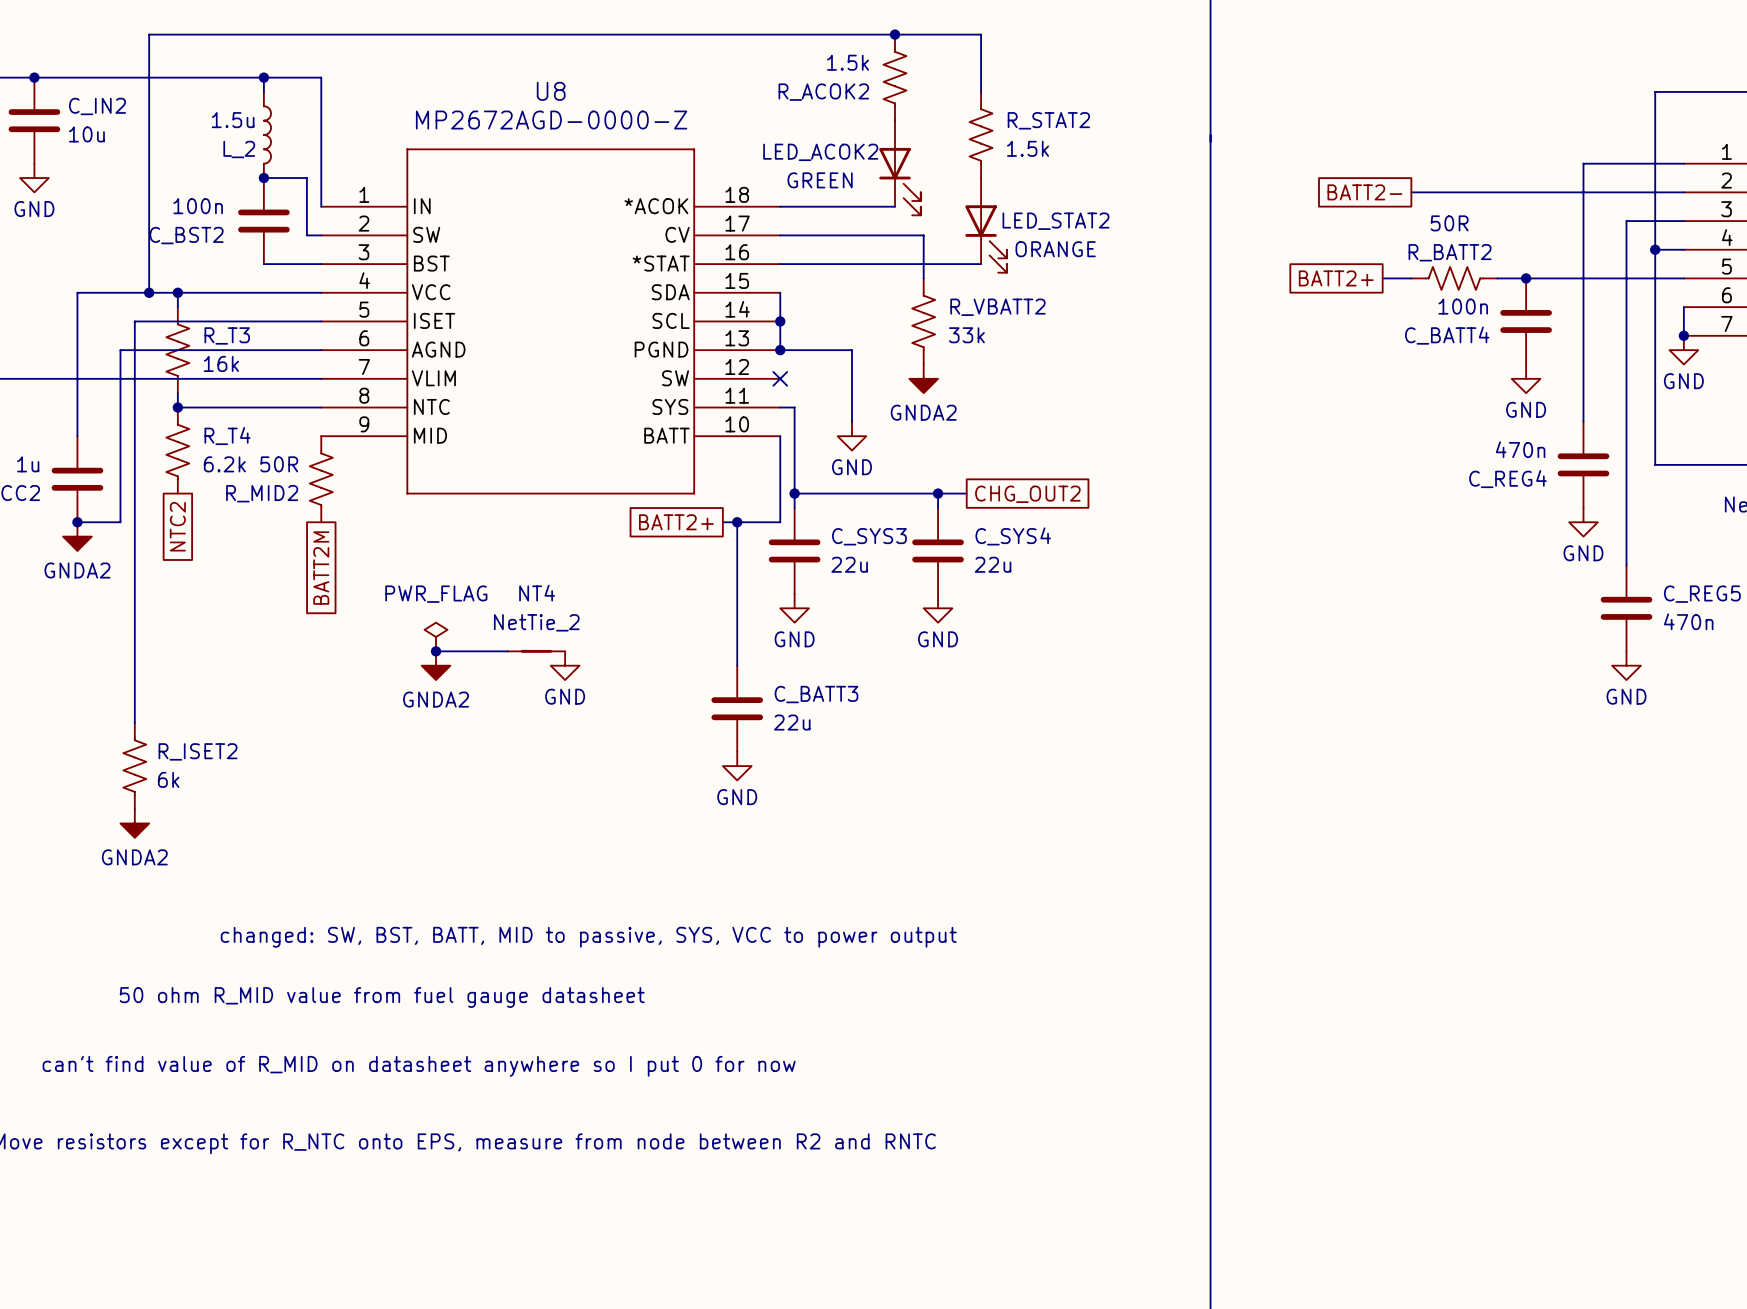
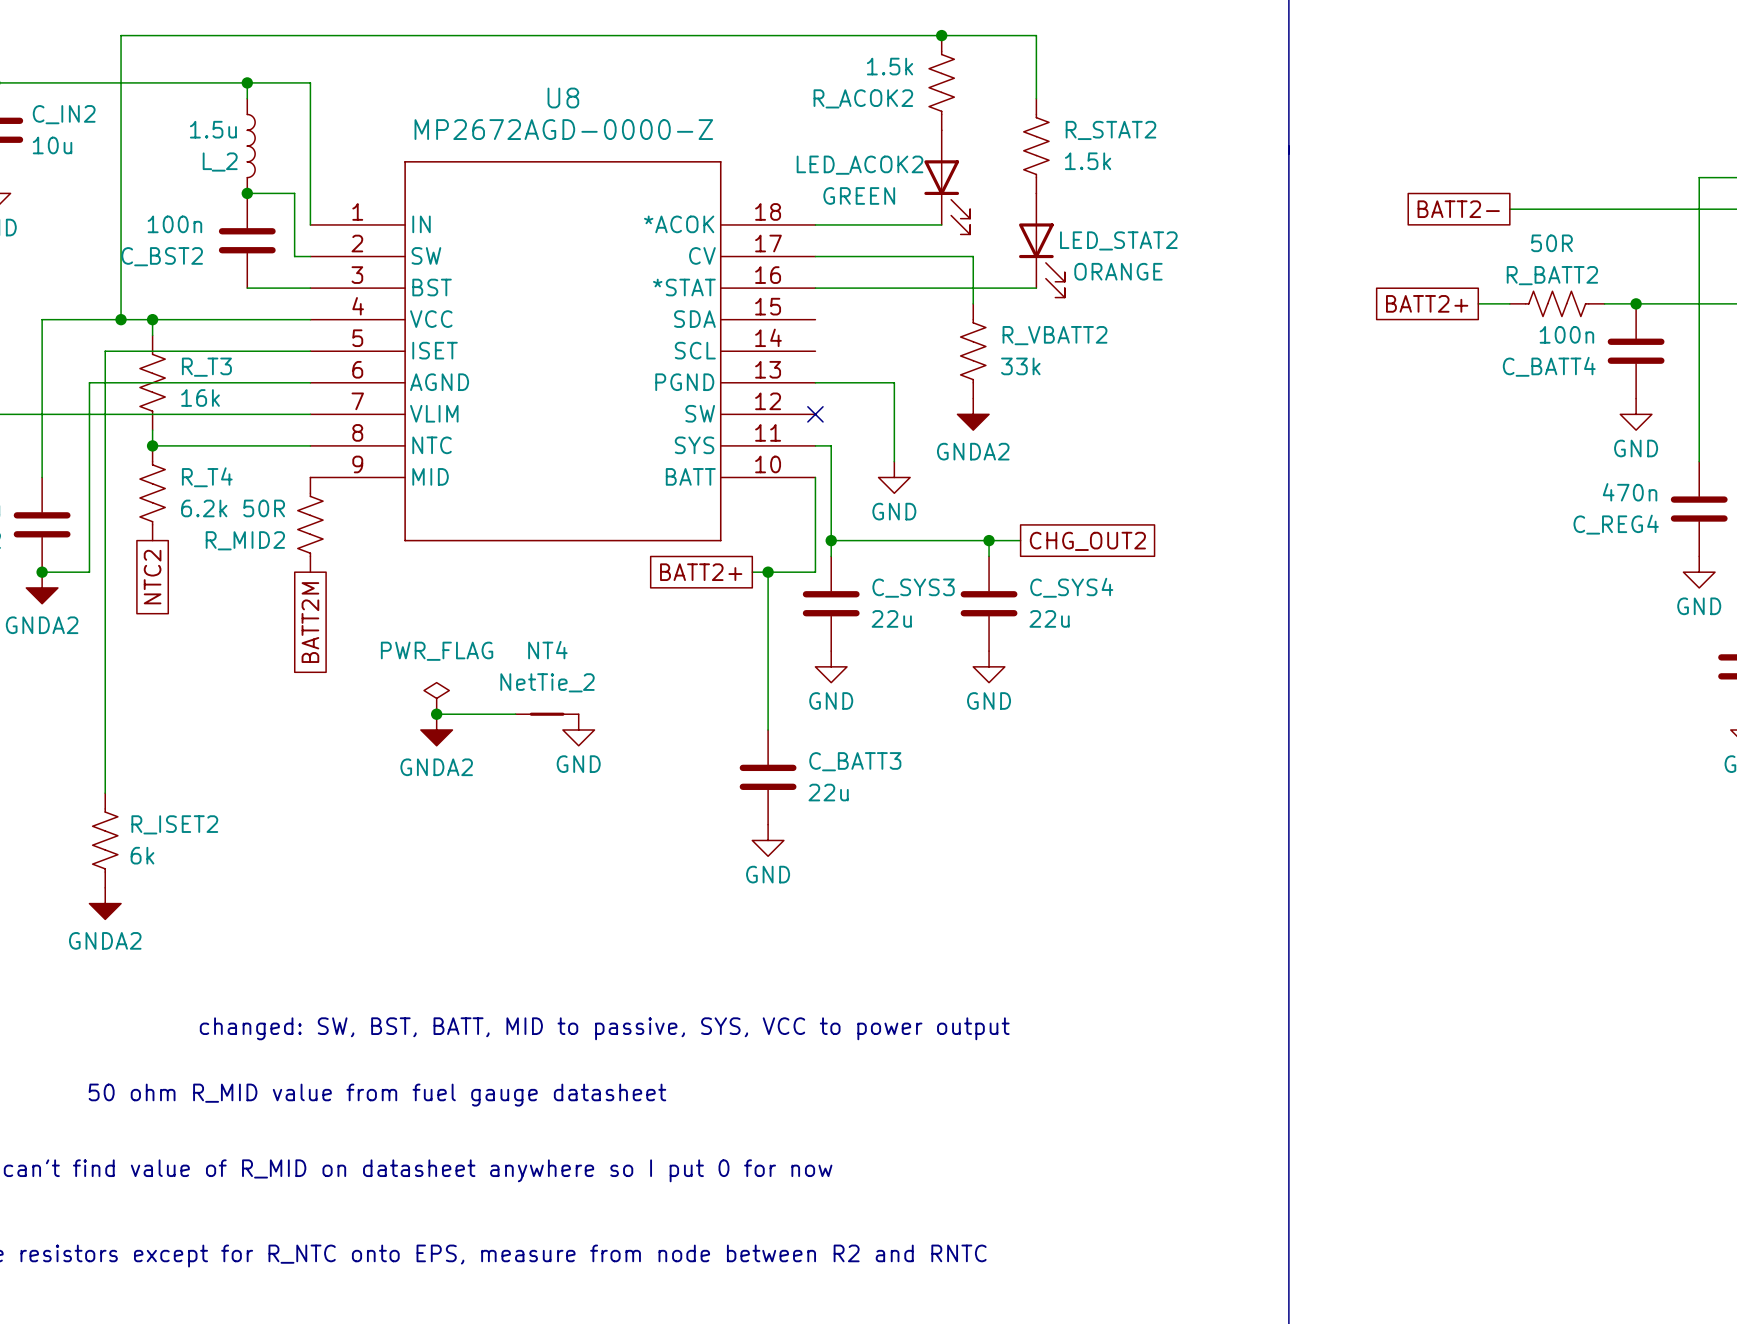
wire: (780, 292) (780, 350) -> none
junction: (780, 321) -> none
junction: (780, 350) -> none

